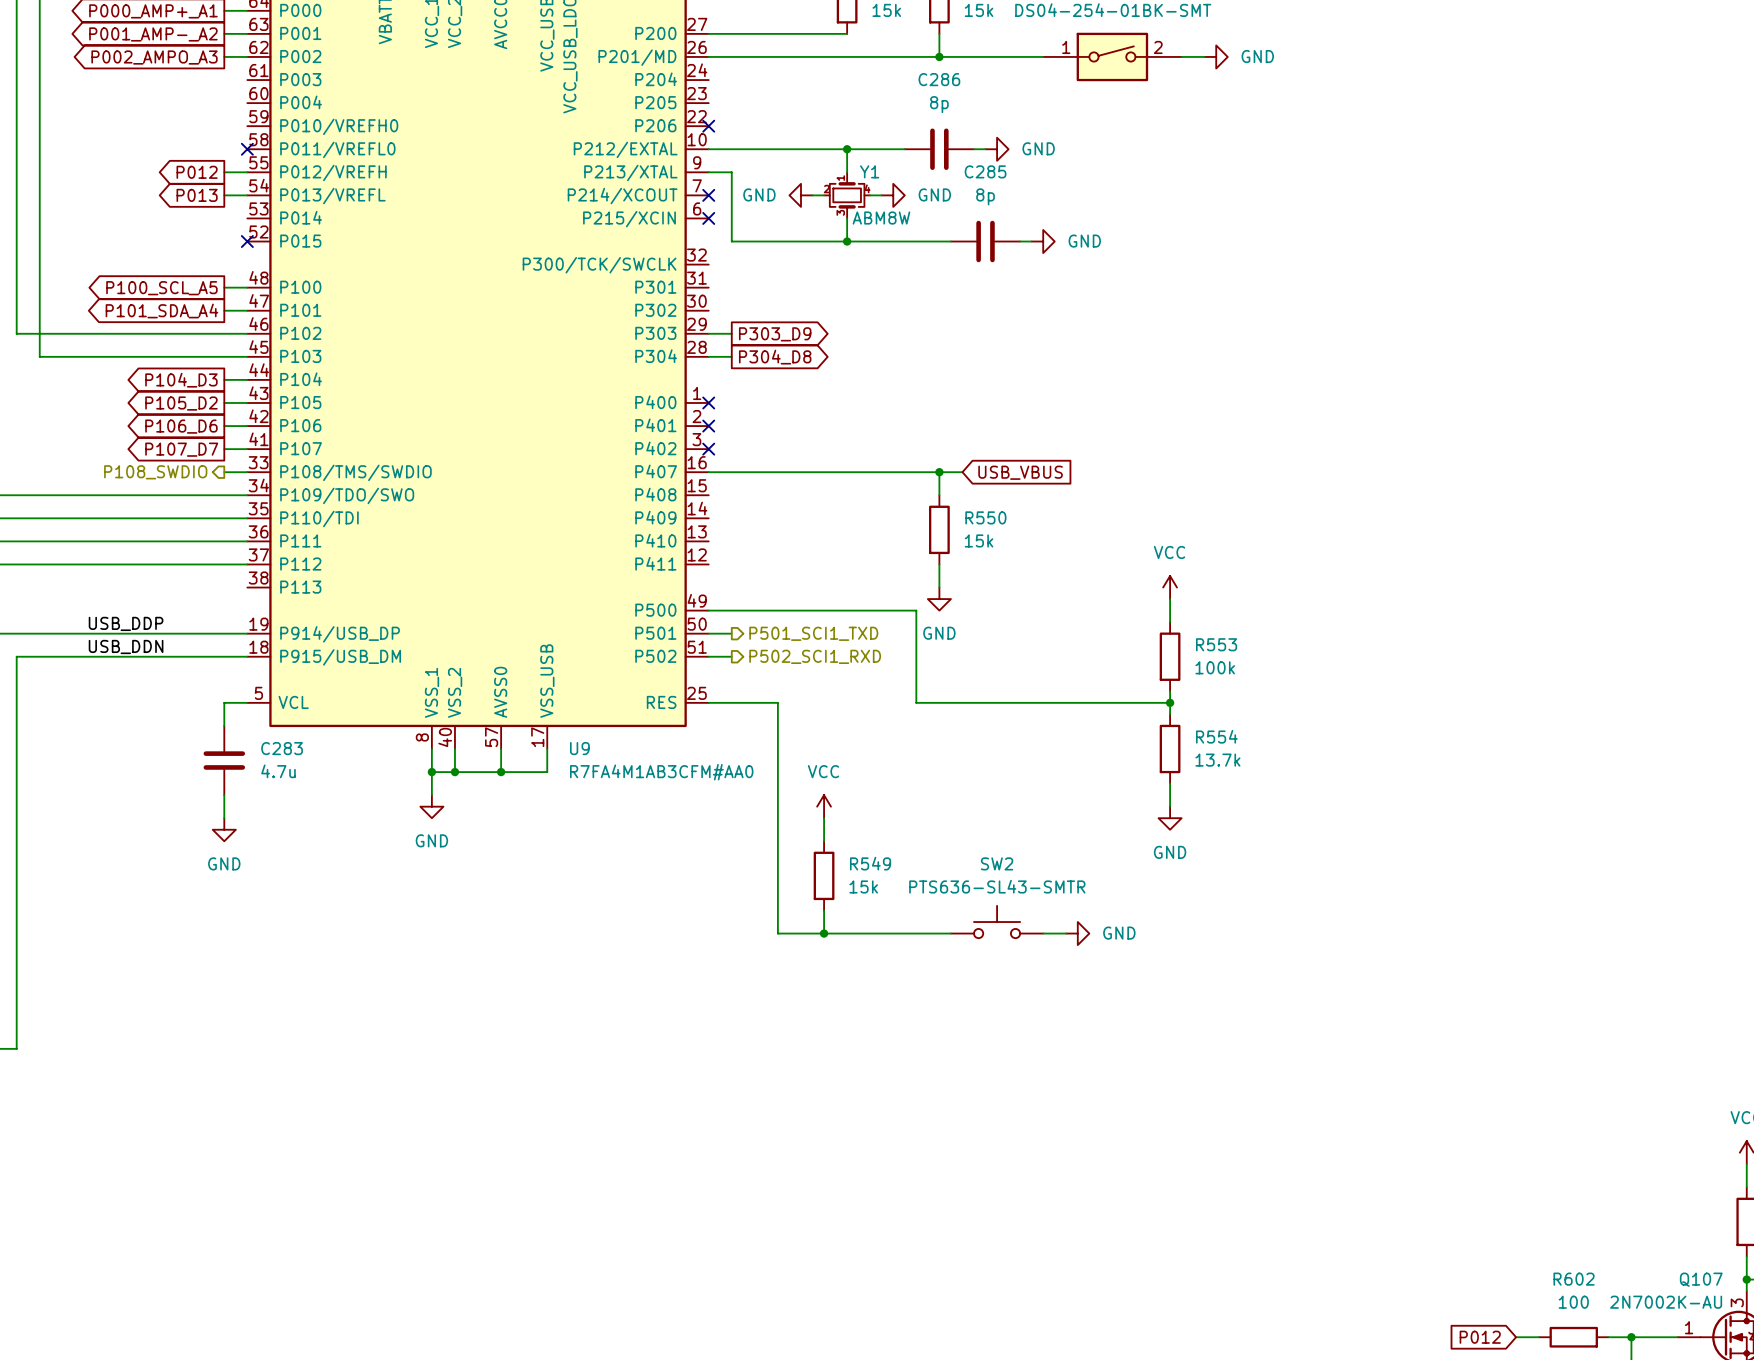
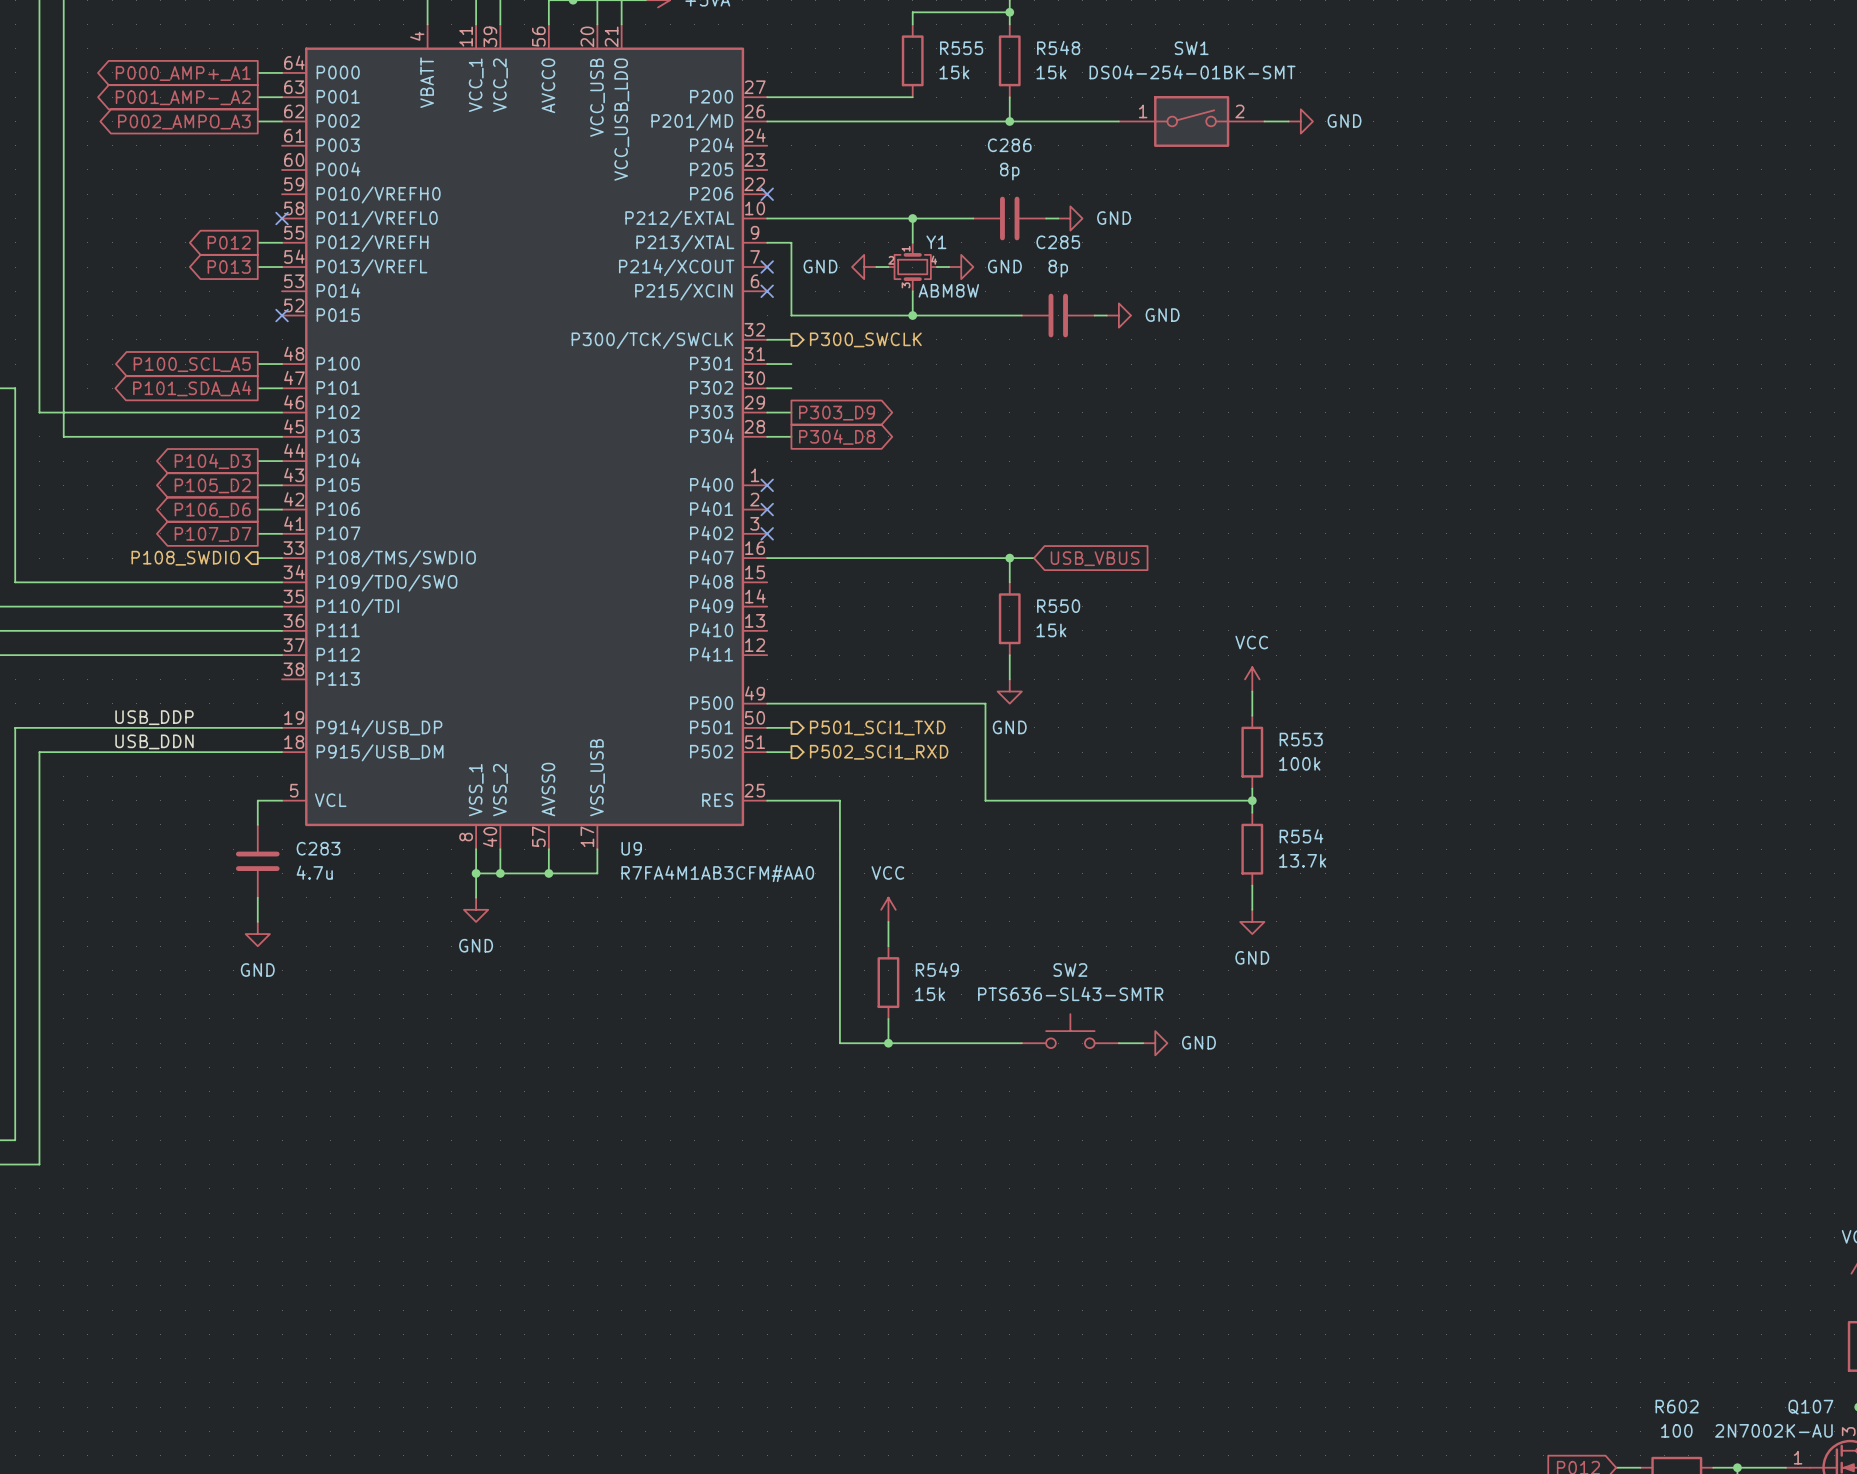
wire: none -> (767, 339) (791, 339)
hierarchical label: none -> P300_SWCLK (865, 339)
wire: none -> (767, 364) (791, 364)
wire: none -> (767, 388) (791, 388)

